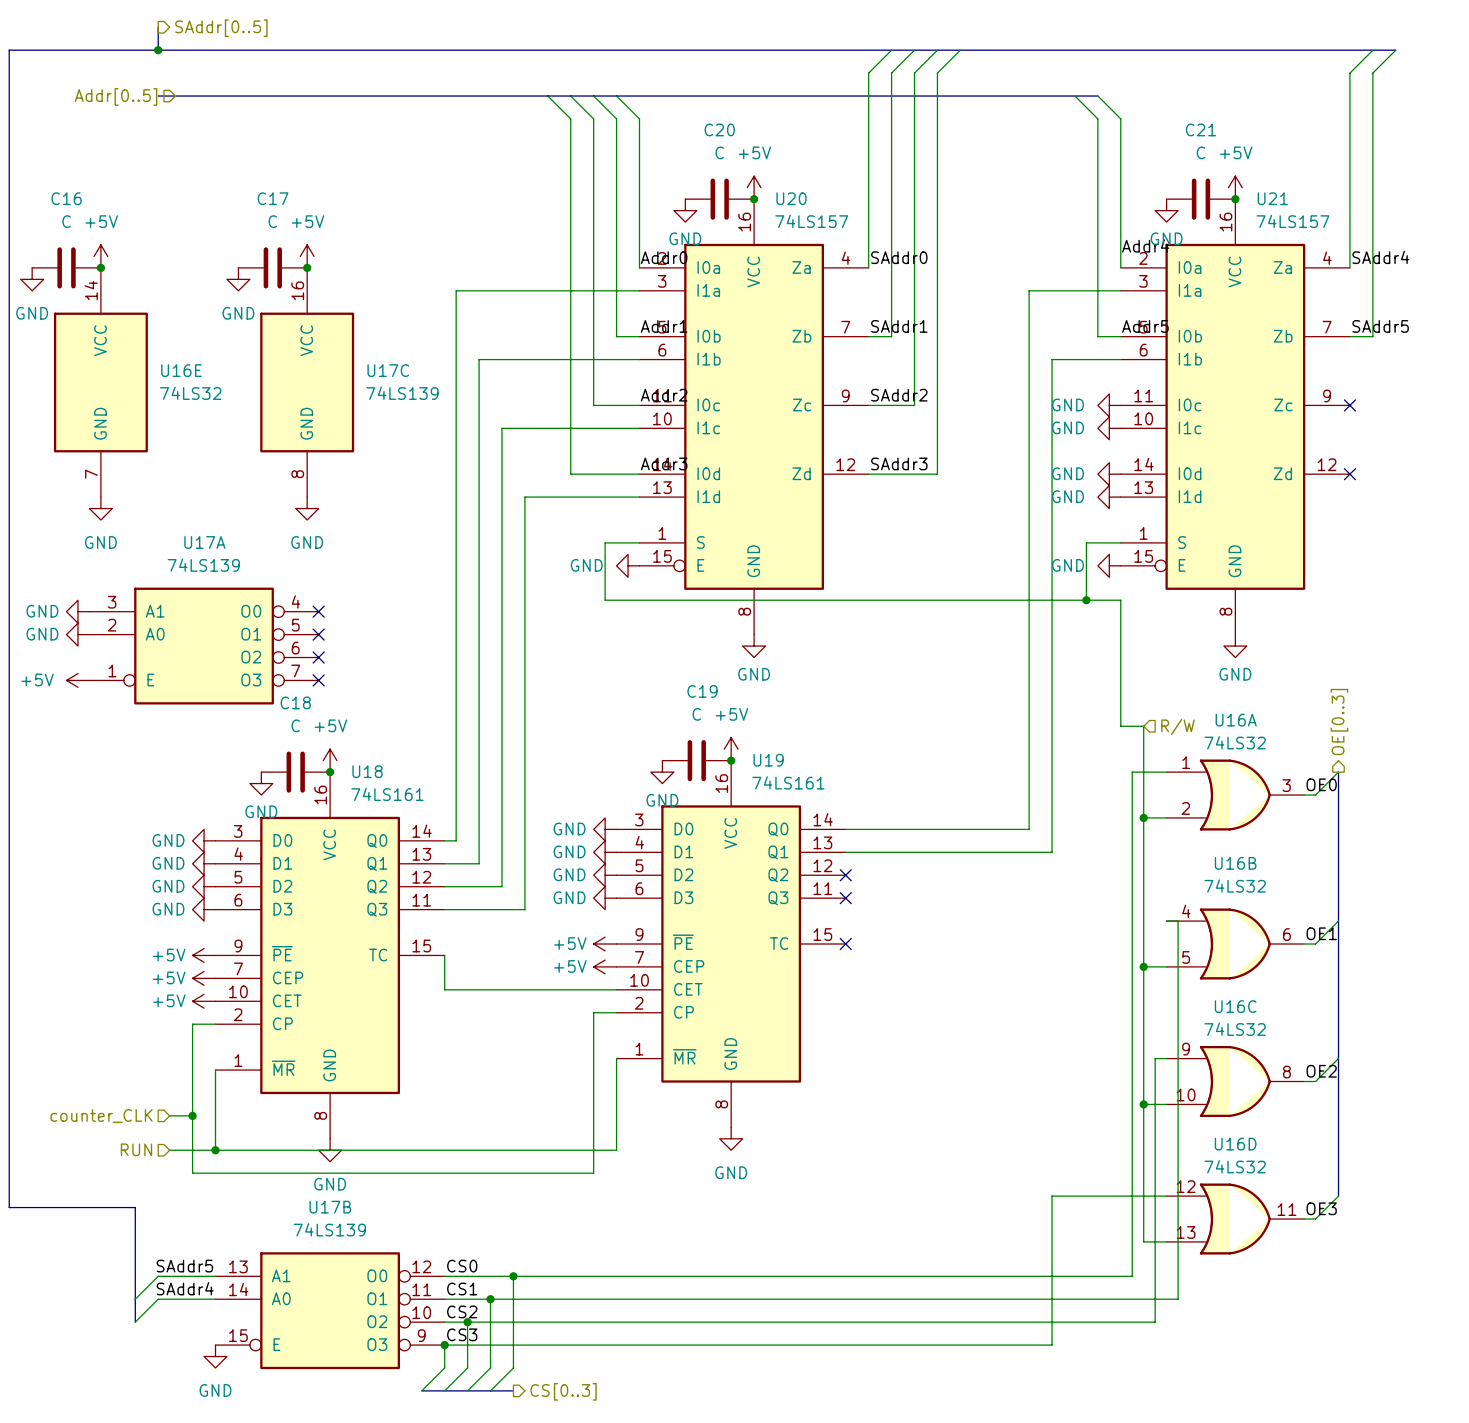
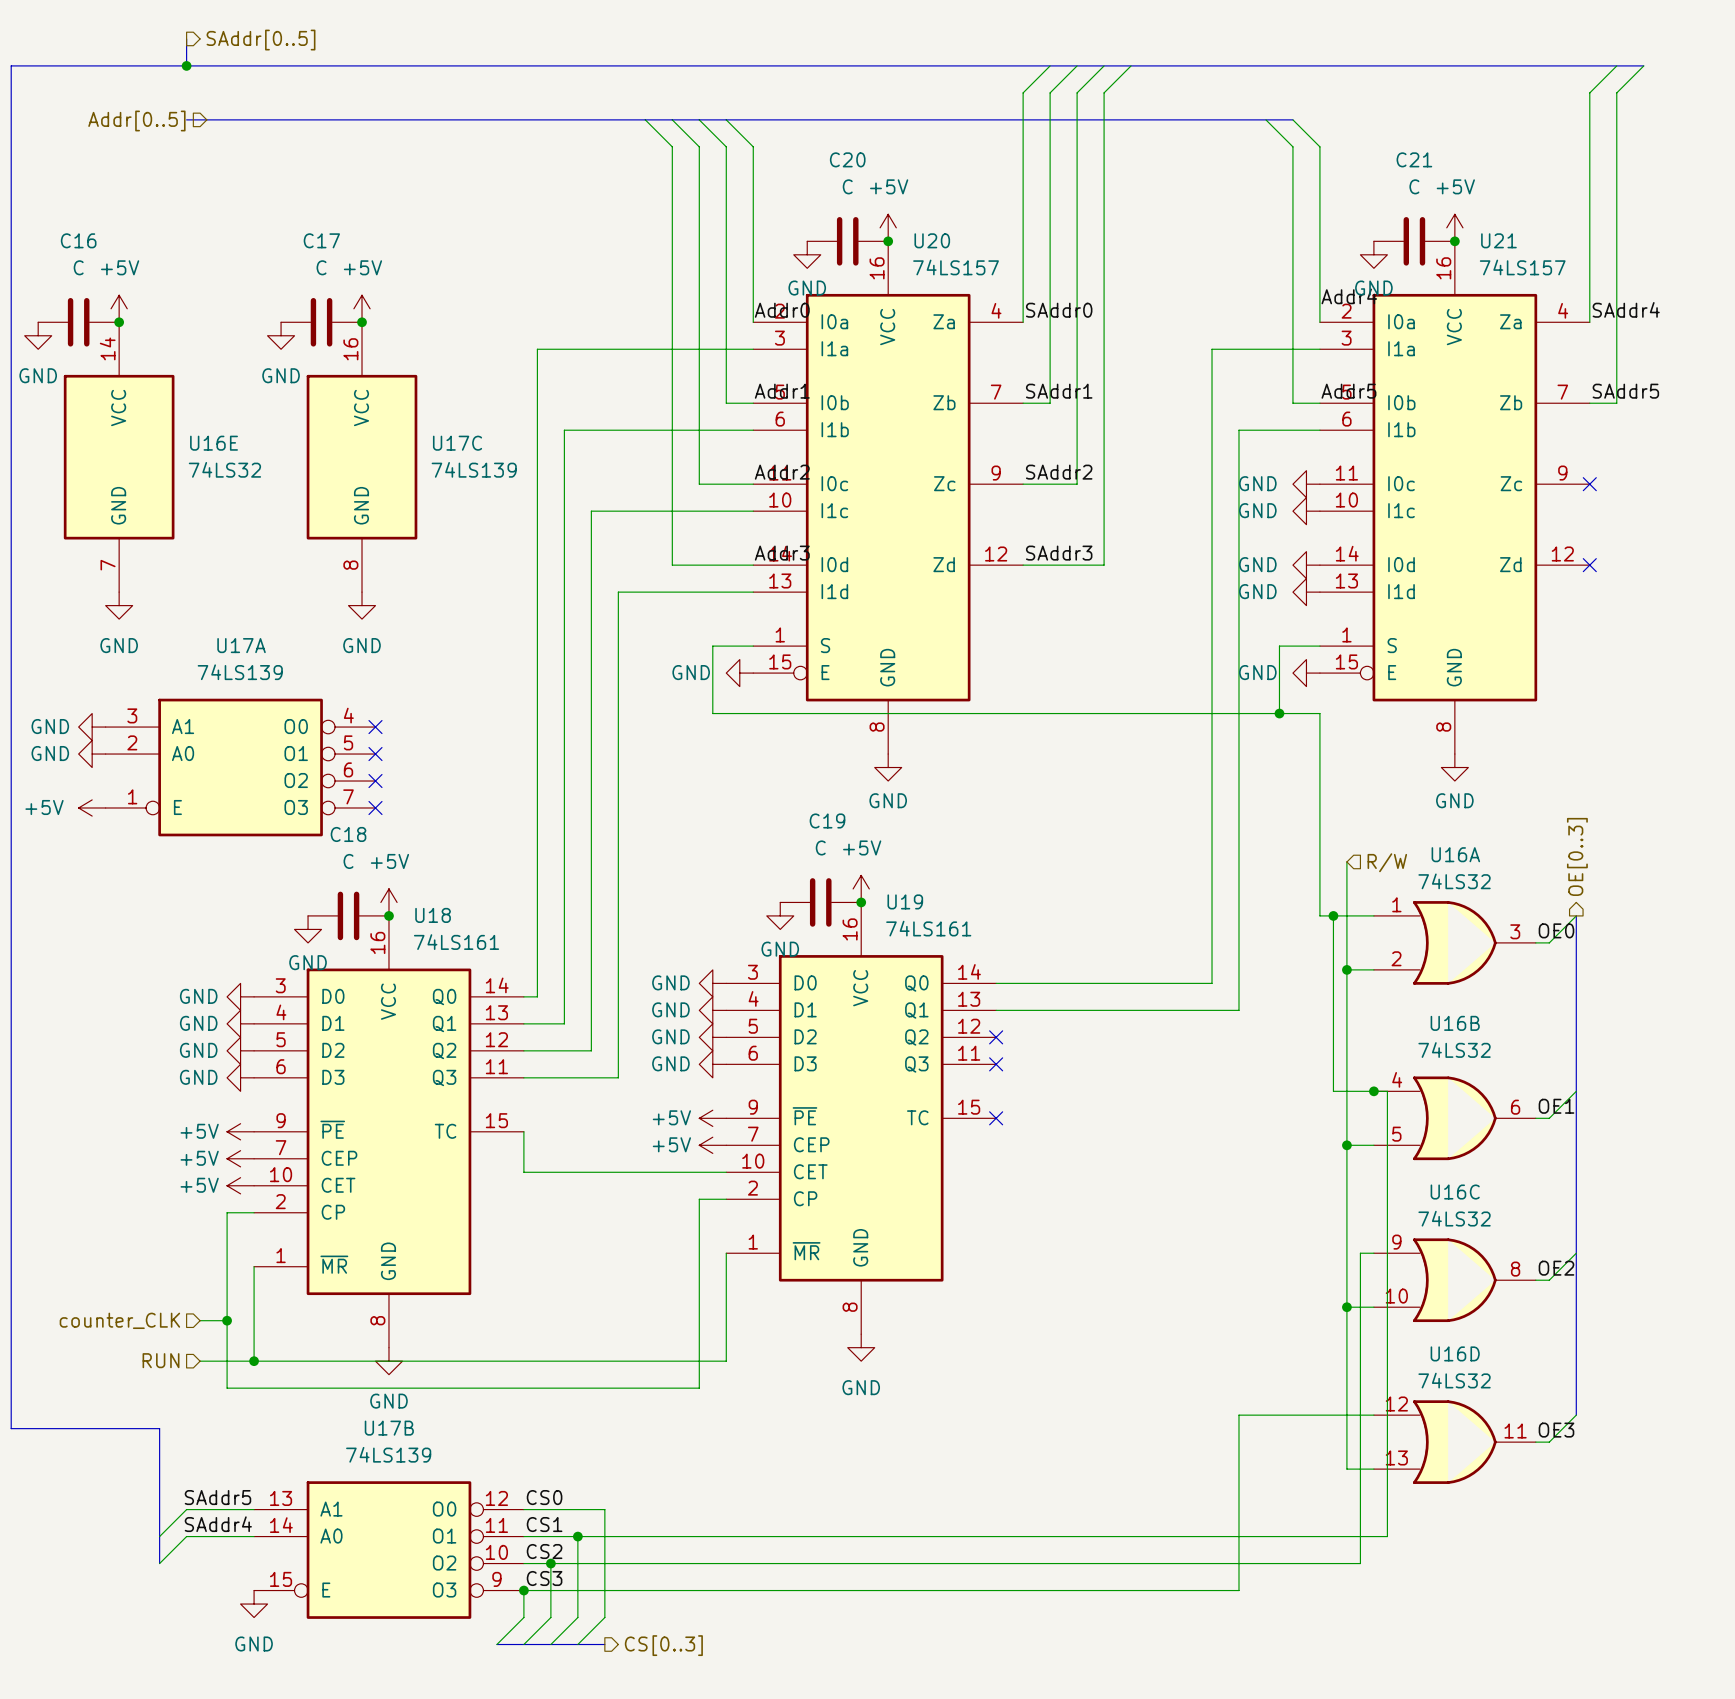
wire: (1120, 726) (1143, 726) -> (1319, 861) (1319, 915) (1333, 915)
junction: none -> (1333, 915)
wire: (1132, 921) (1132, 1276) (513, 1276) -> (1333, 1091) (1373, 1091)
junction: none -> (1373, 1091)
junction: (513, 1276) -> none

